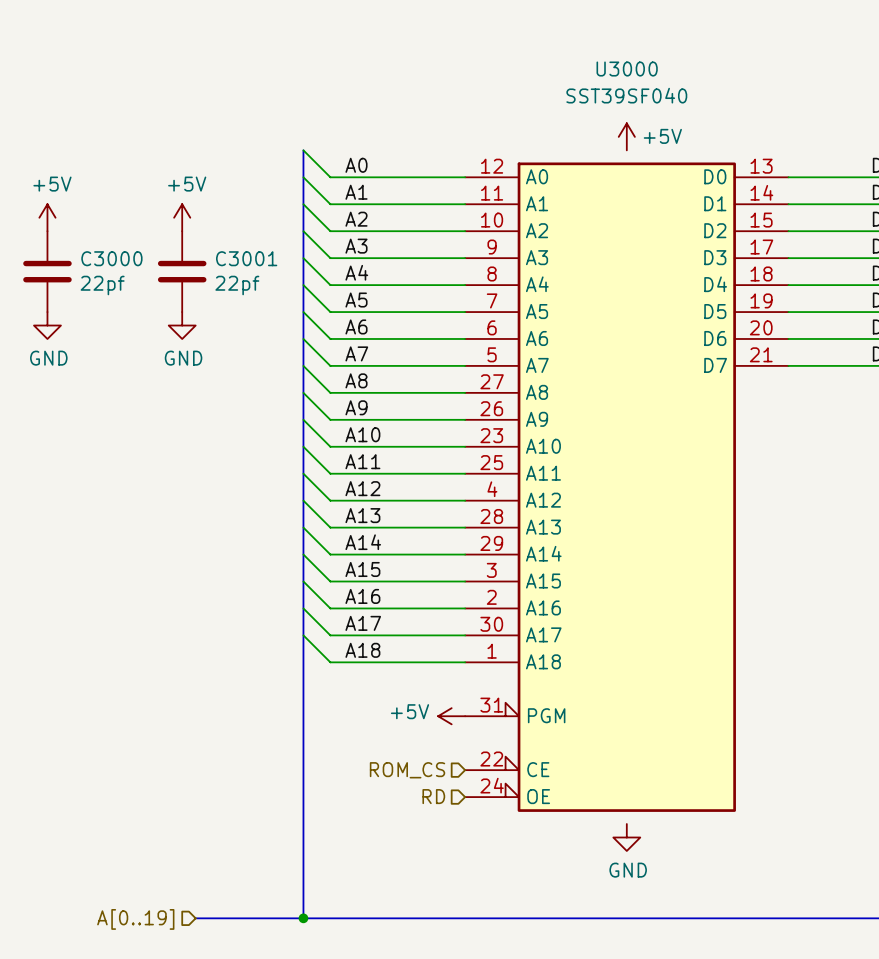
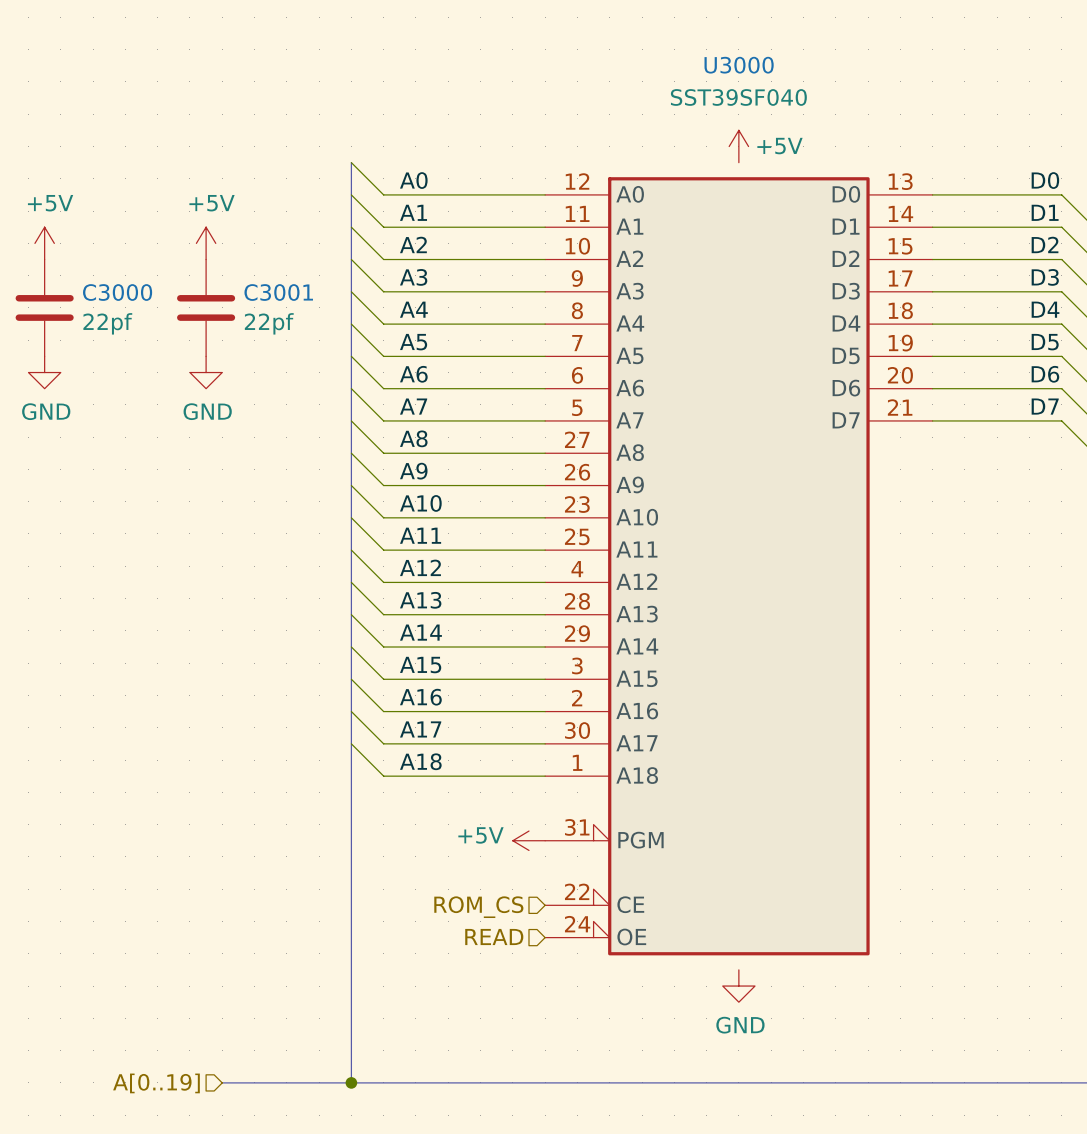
hierarchical label: RD (433, 796) -> READ (494, 937)

